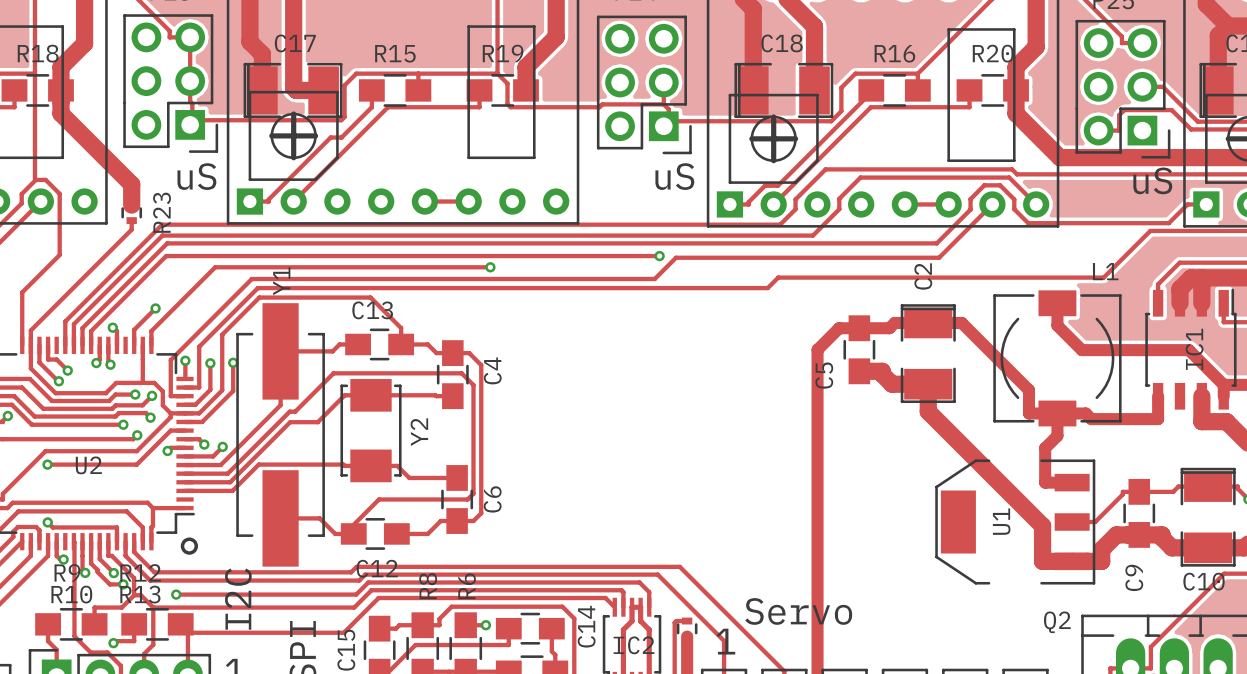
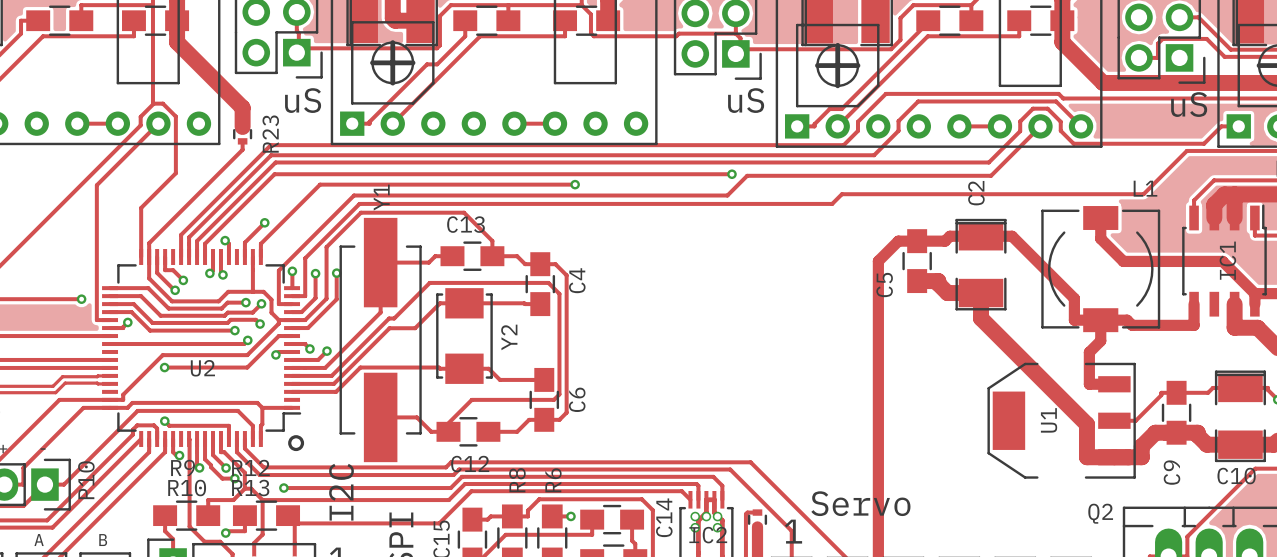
via: none -> (695, 516)
via: none -> (706, 516)
via: none -> (717, 516)
via: none -> (695, 527)
via: none -> (717, 527)

